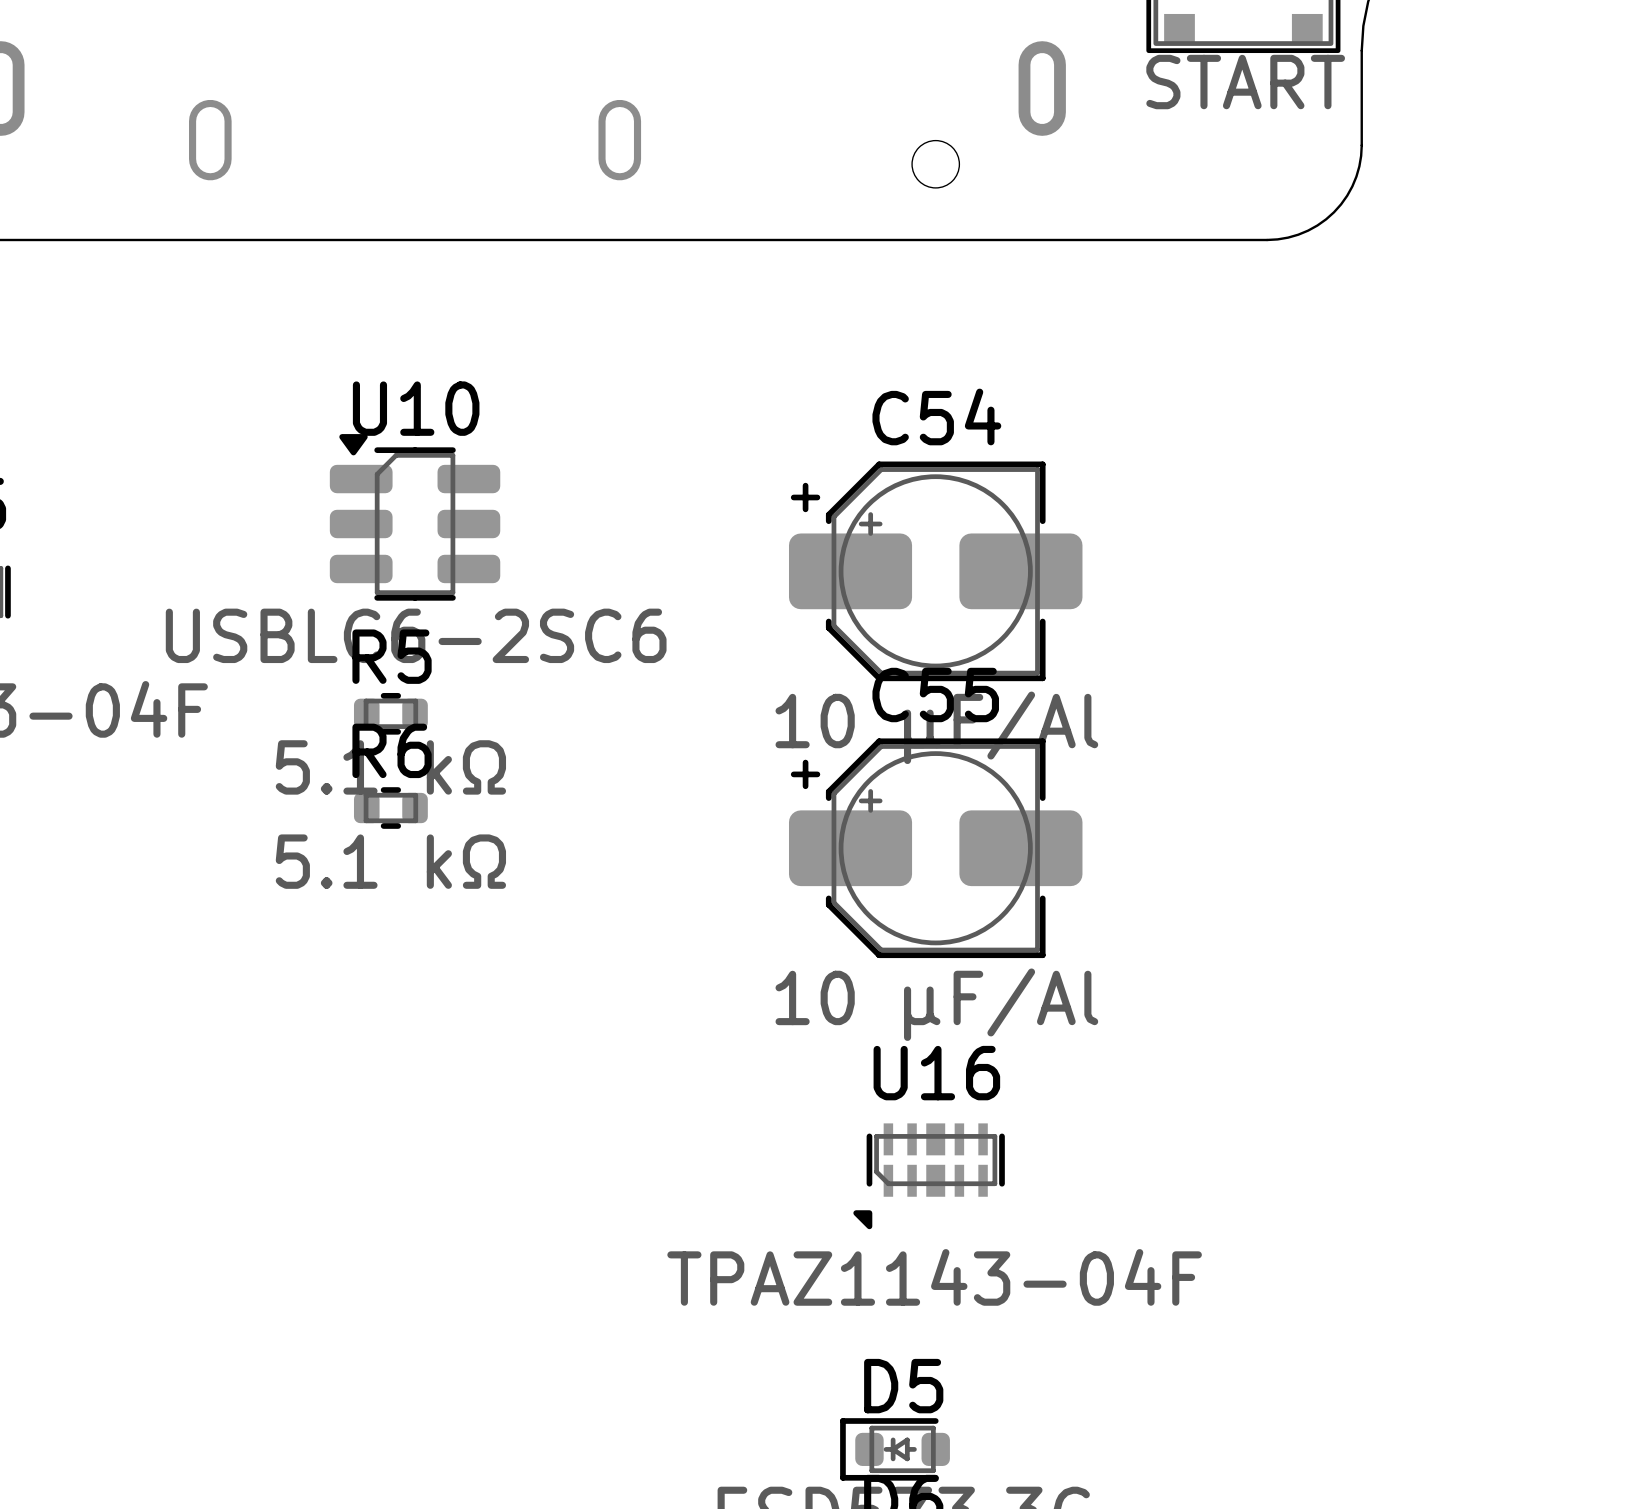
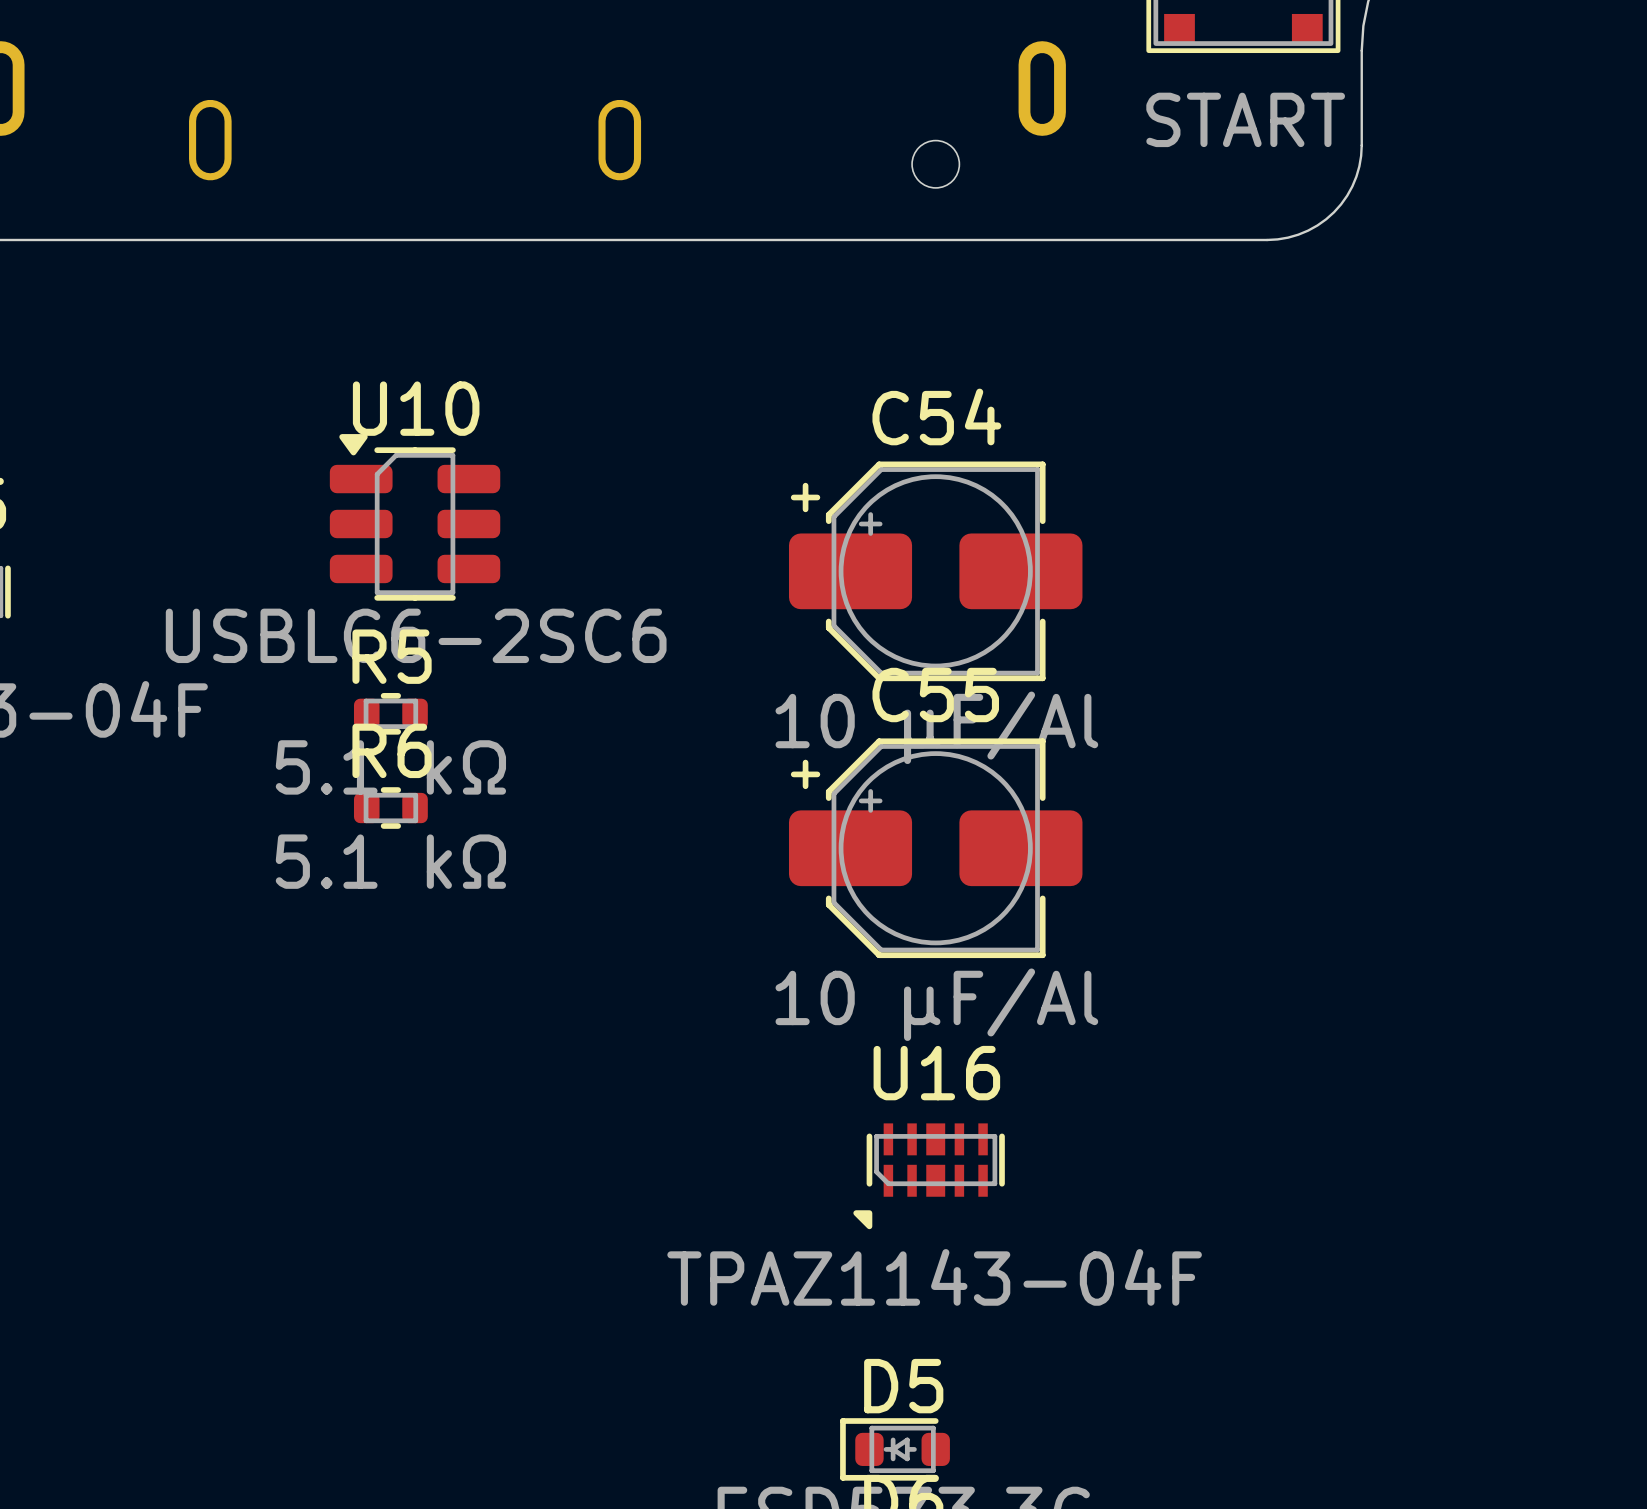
part value position: START (1245, 82) -> START (1245, 119)

